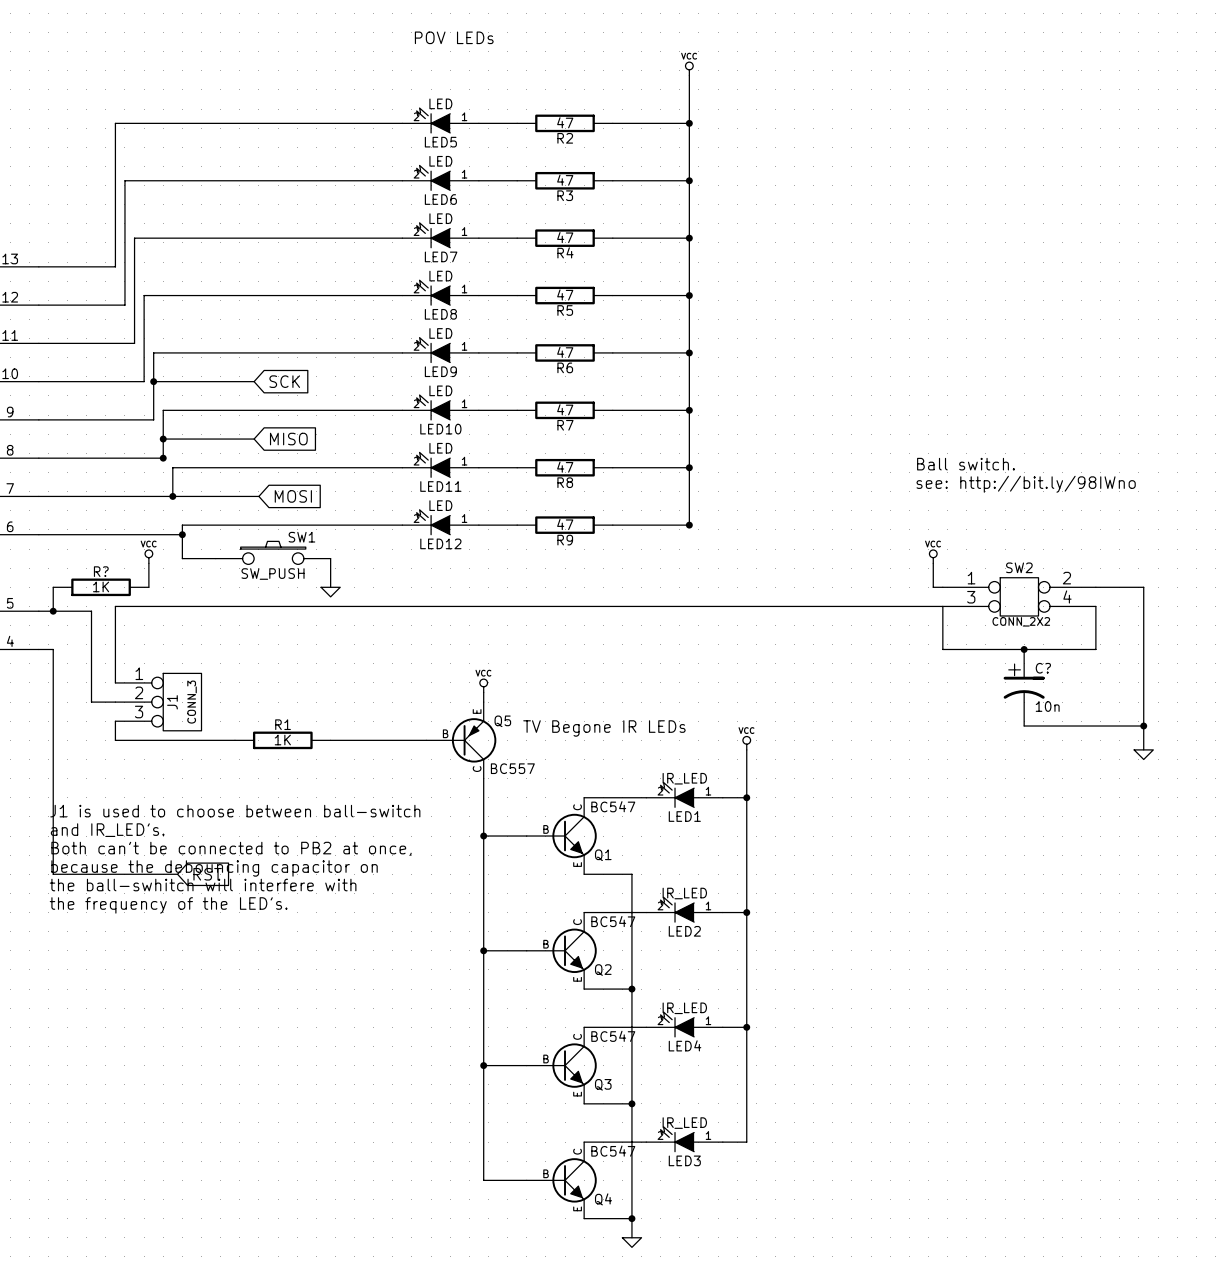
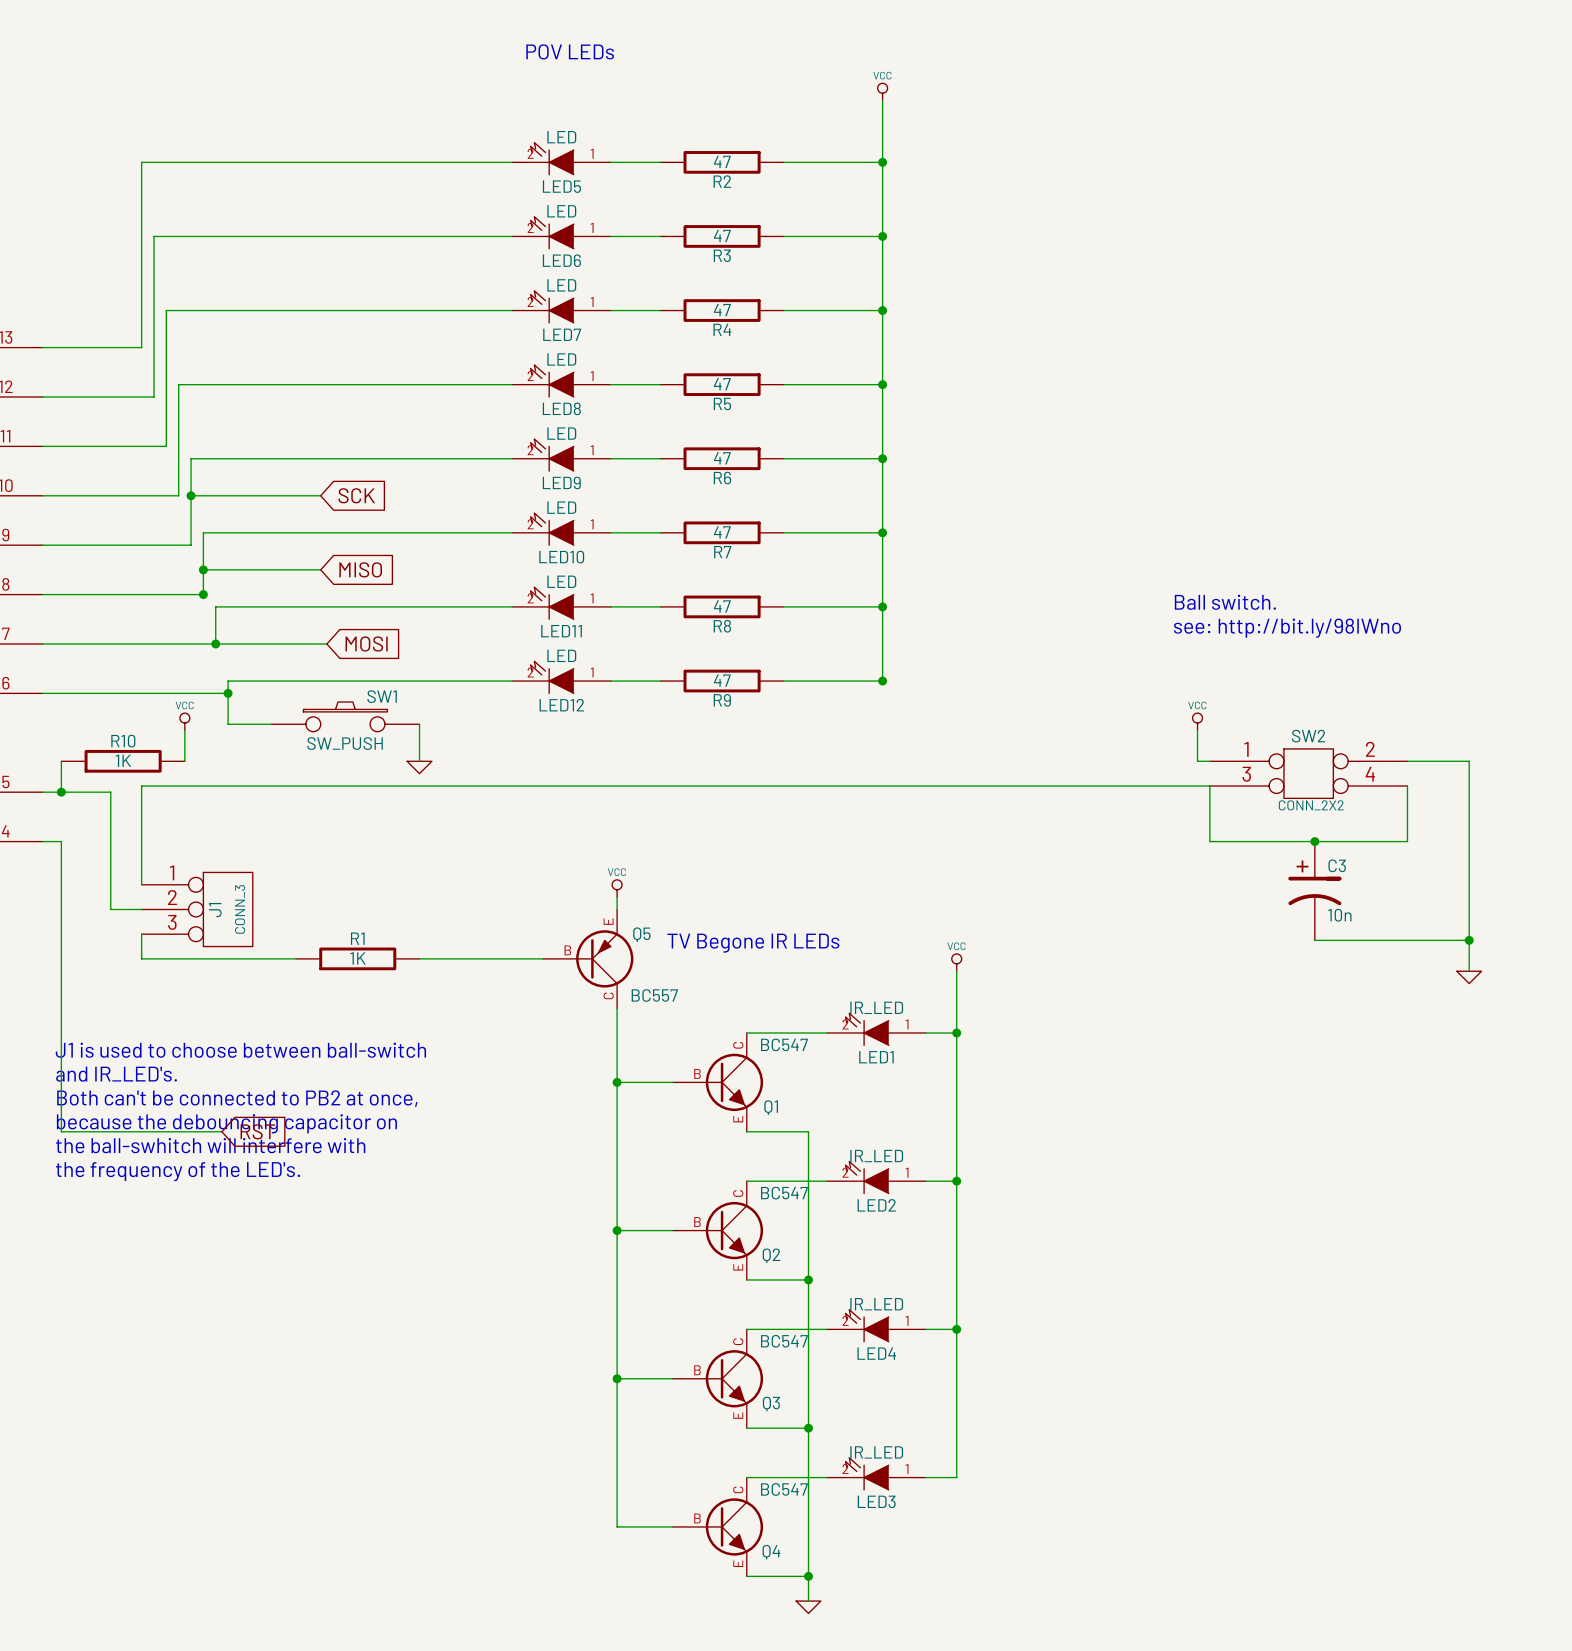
R? name: R? (101, 571) -> R10 (123, 741)
C? name: C? (1043, 668) -> C3 (1337, 865)

